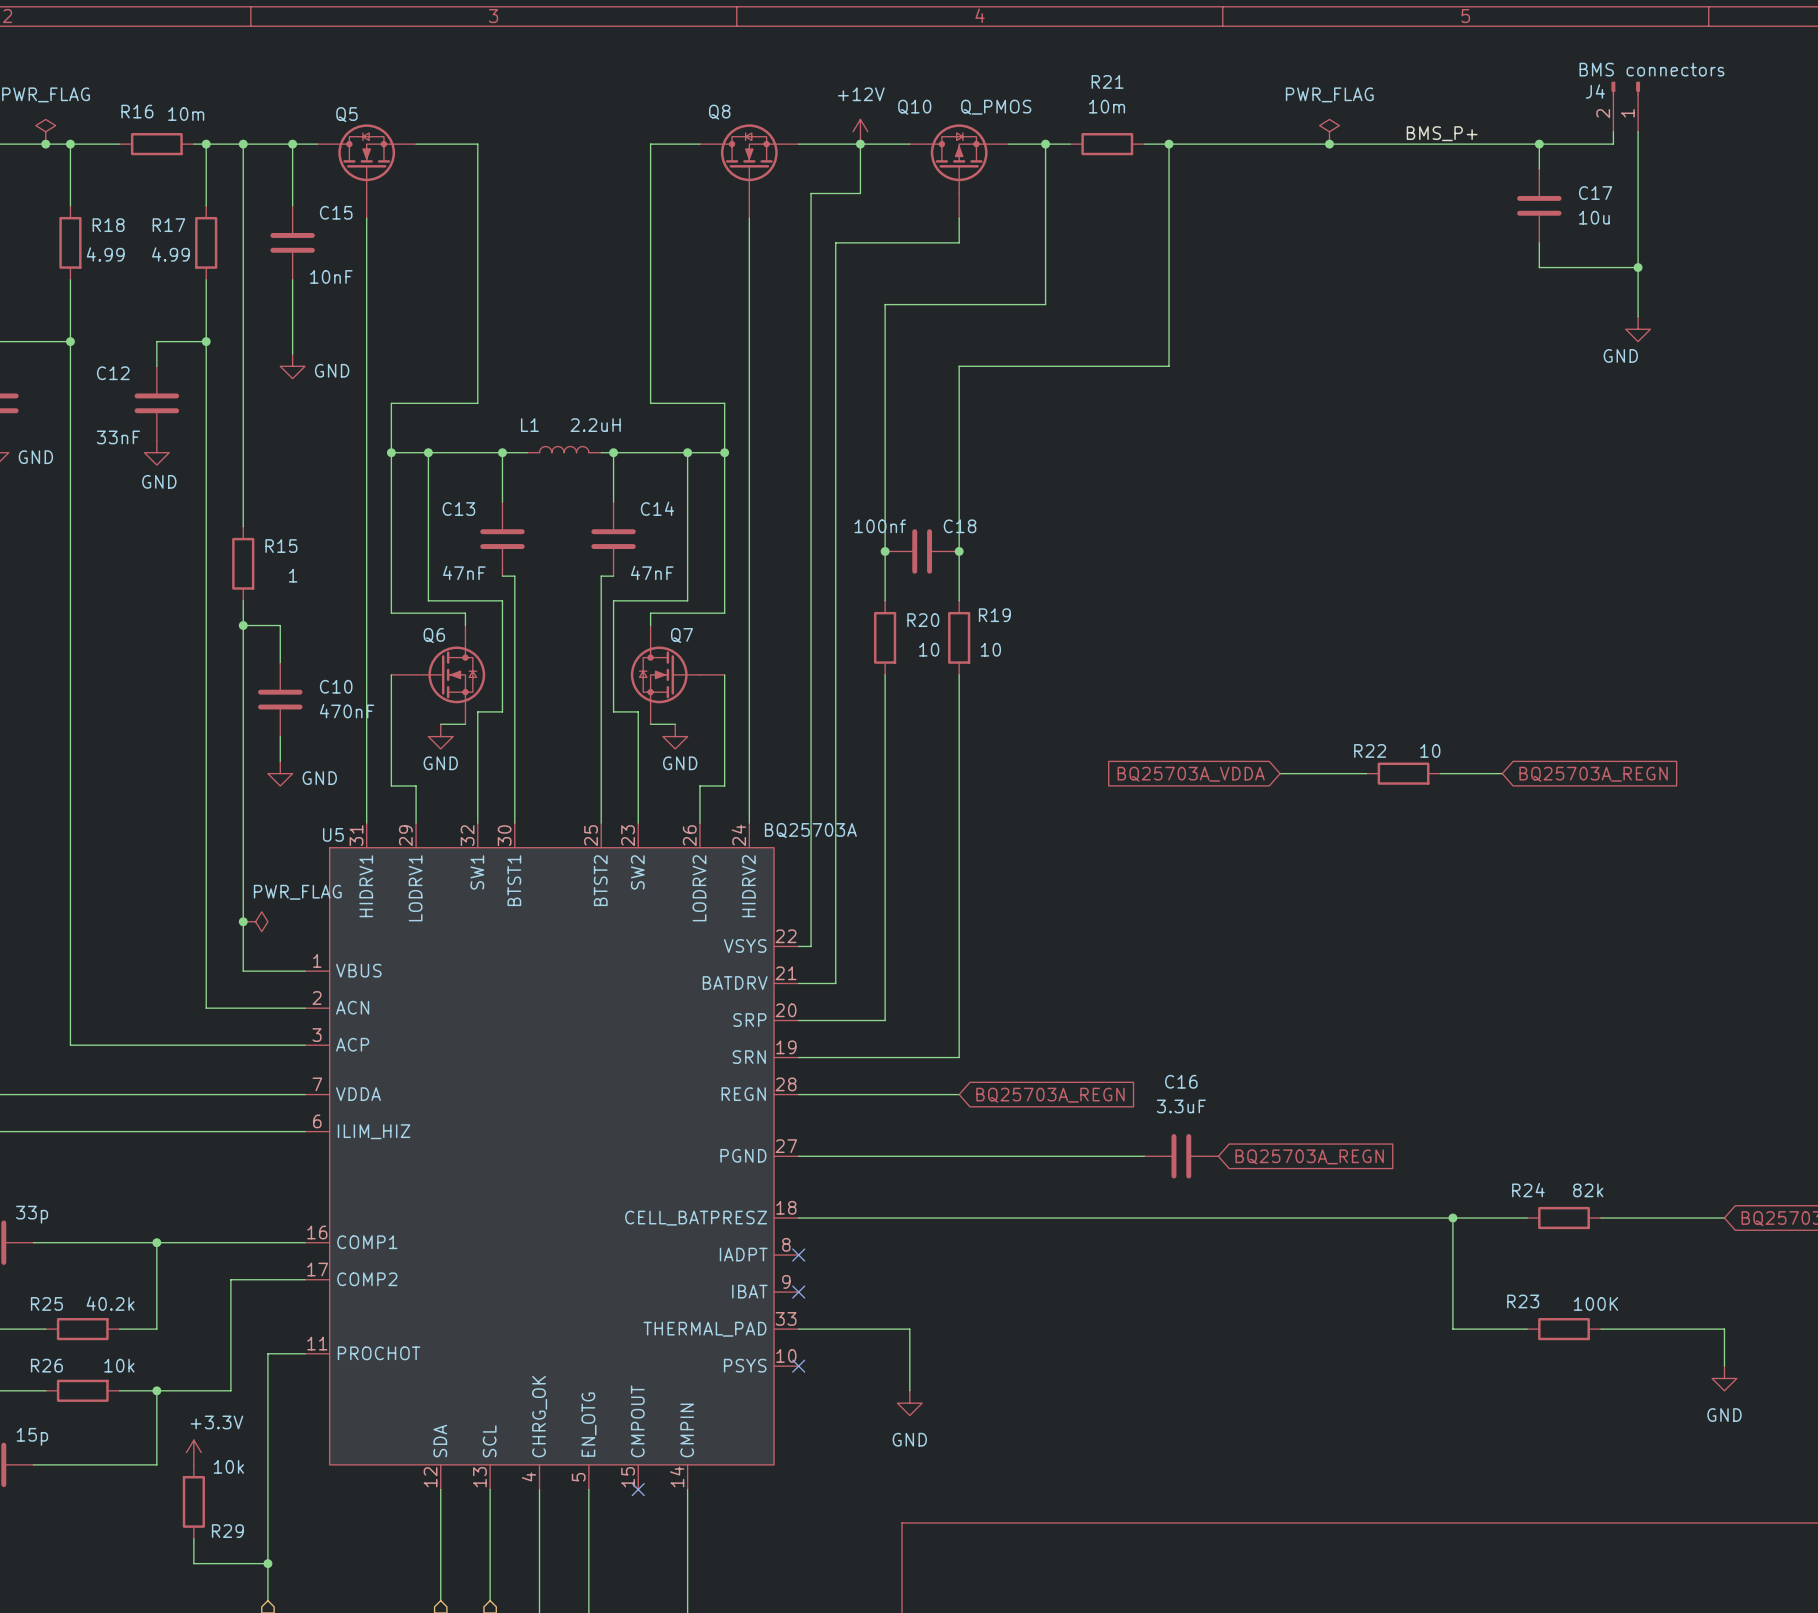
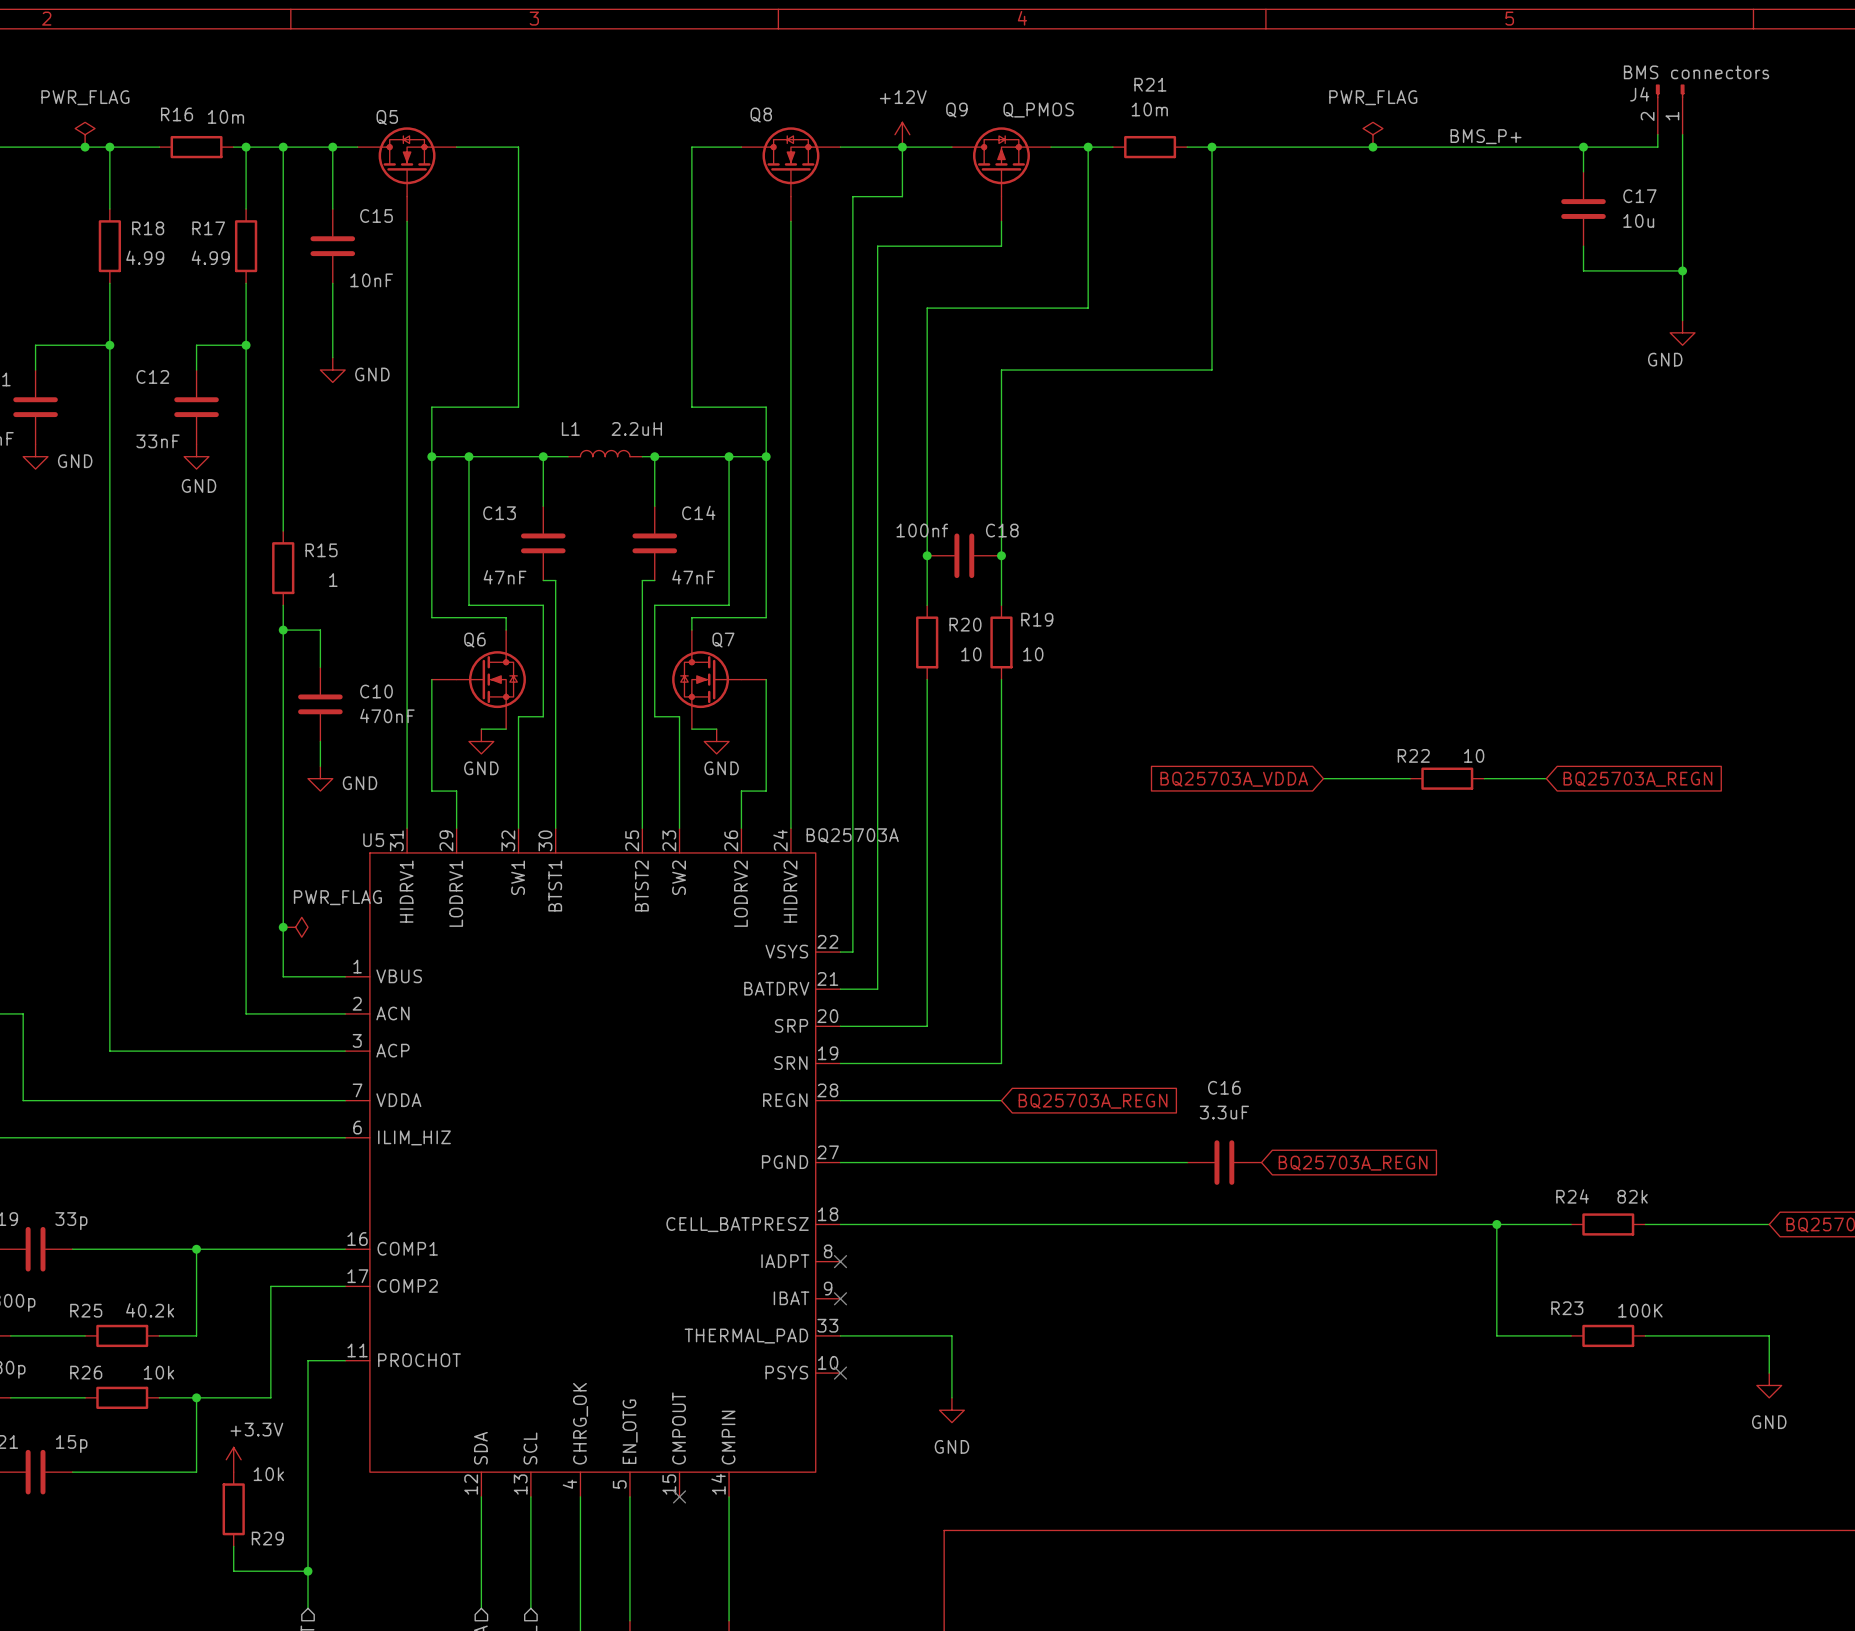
Q10 name: Q10 (914, 107) -> Q9 (956, 110)

